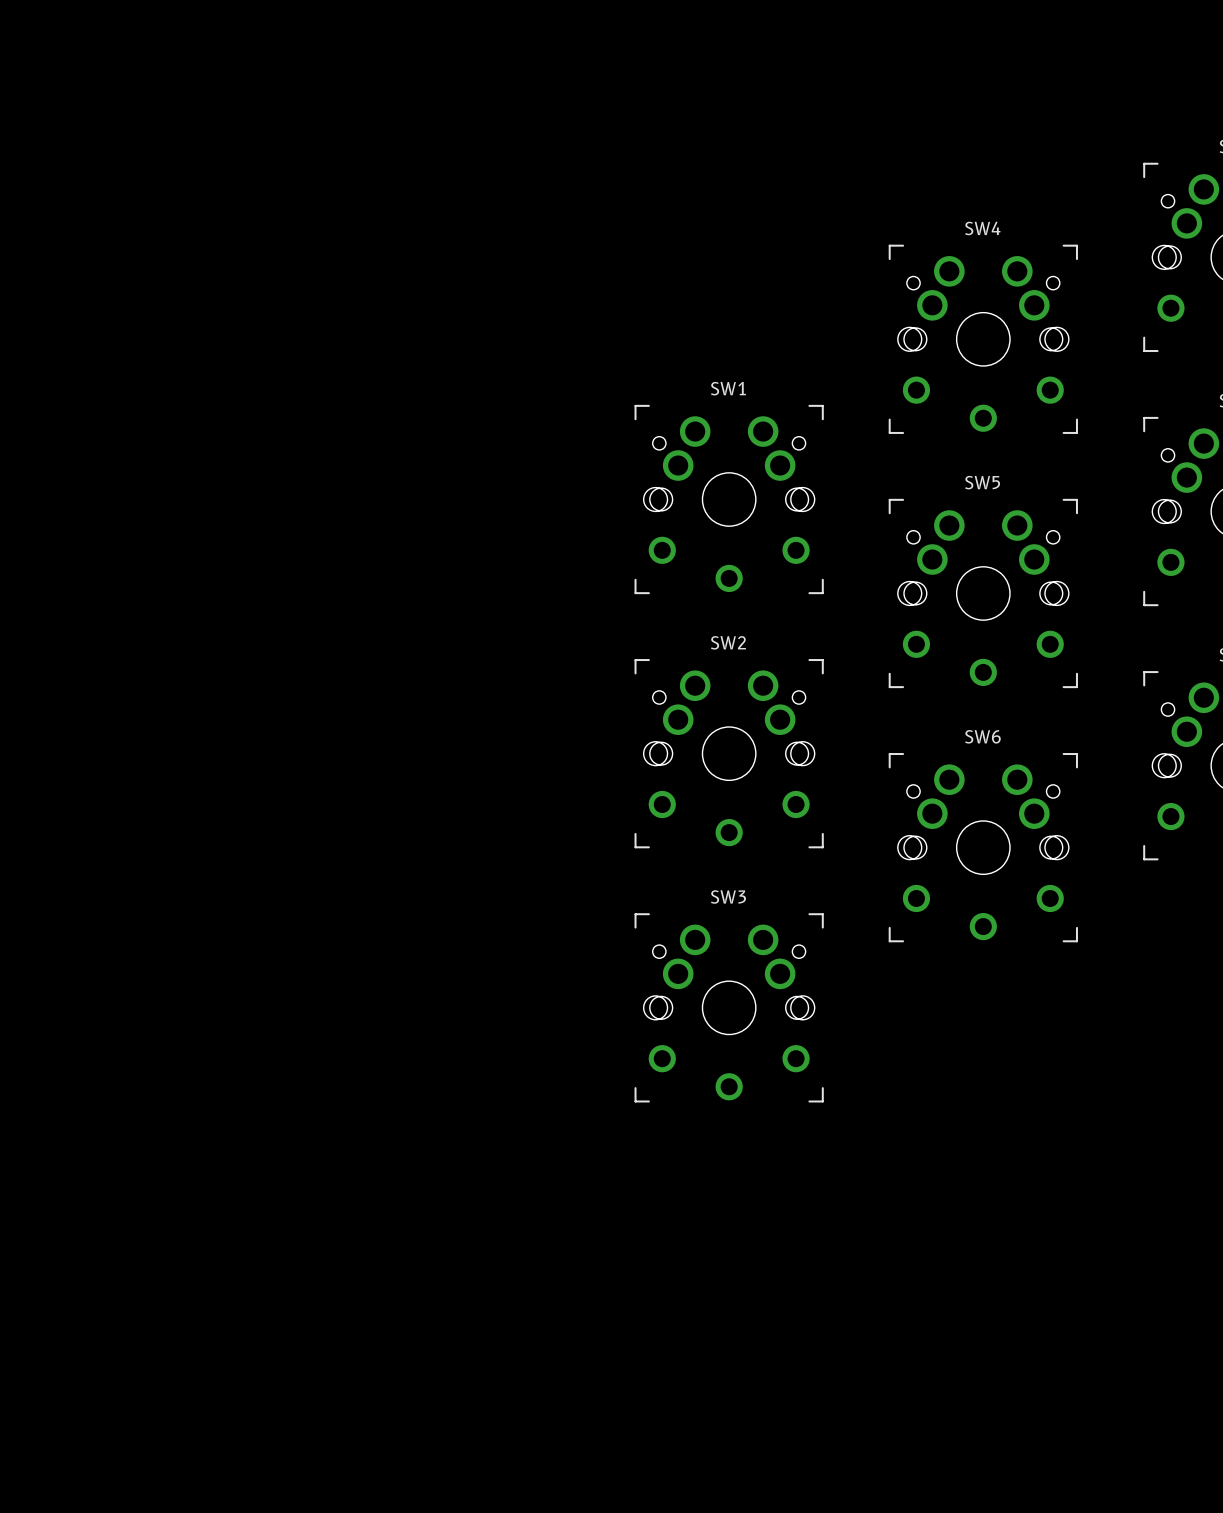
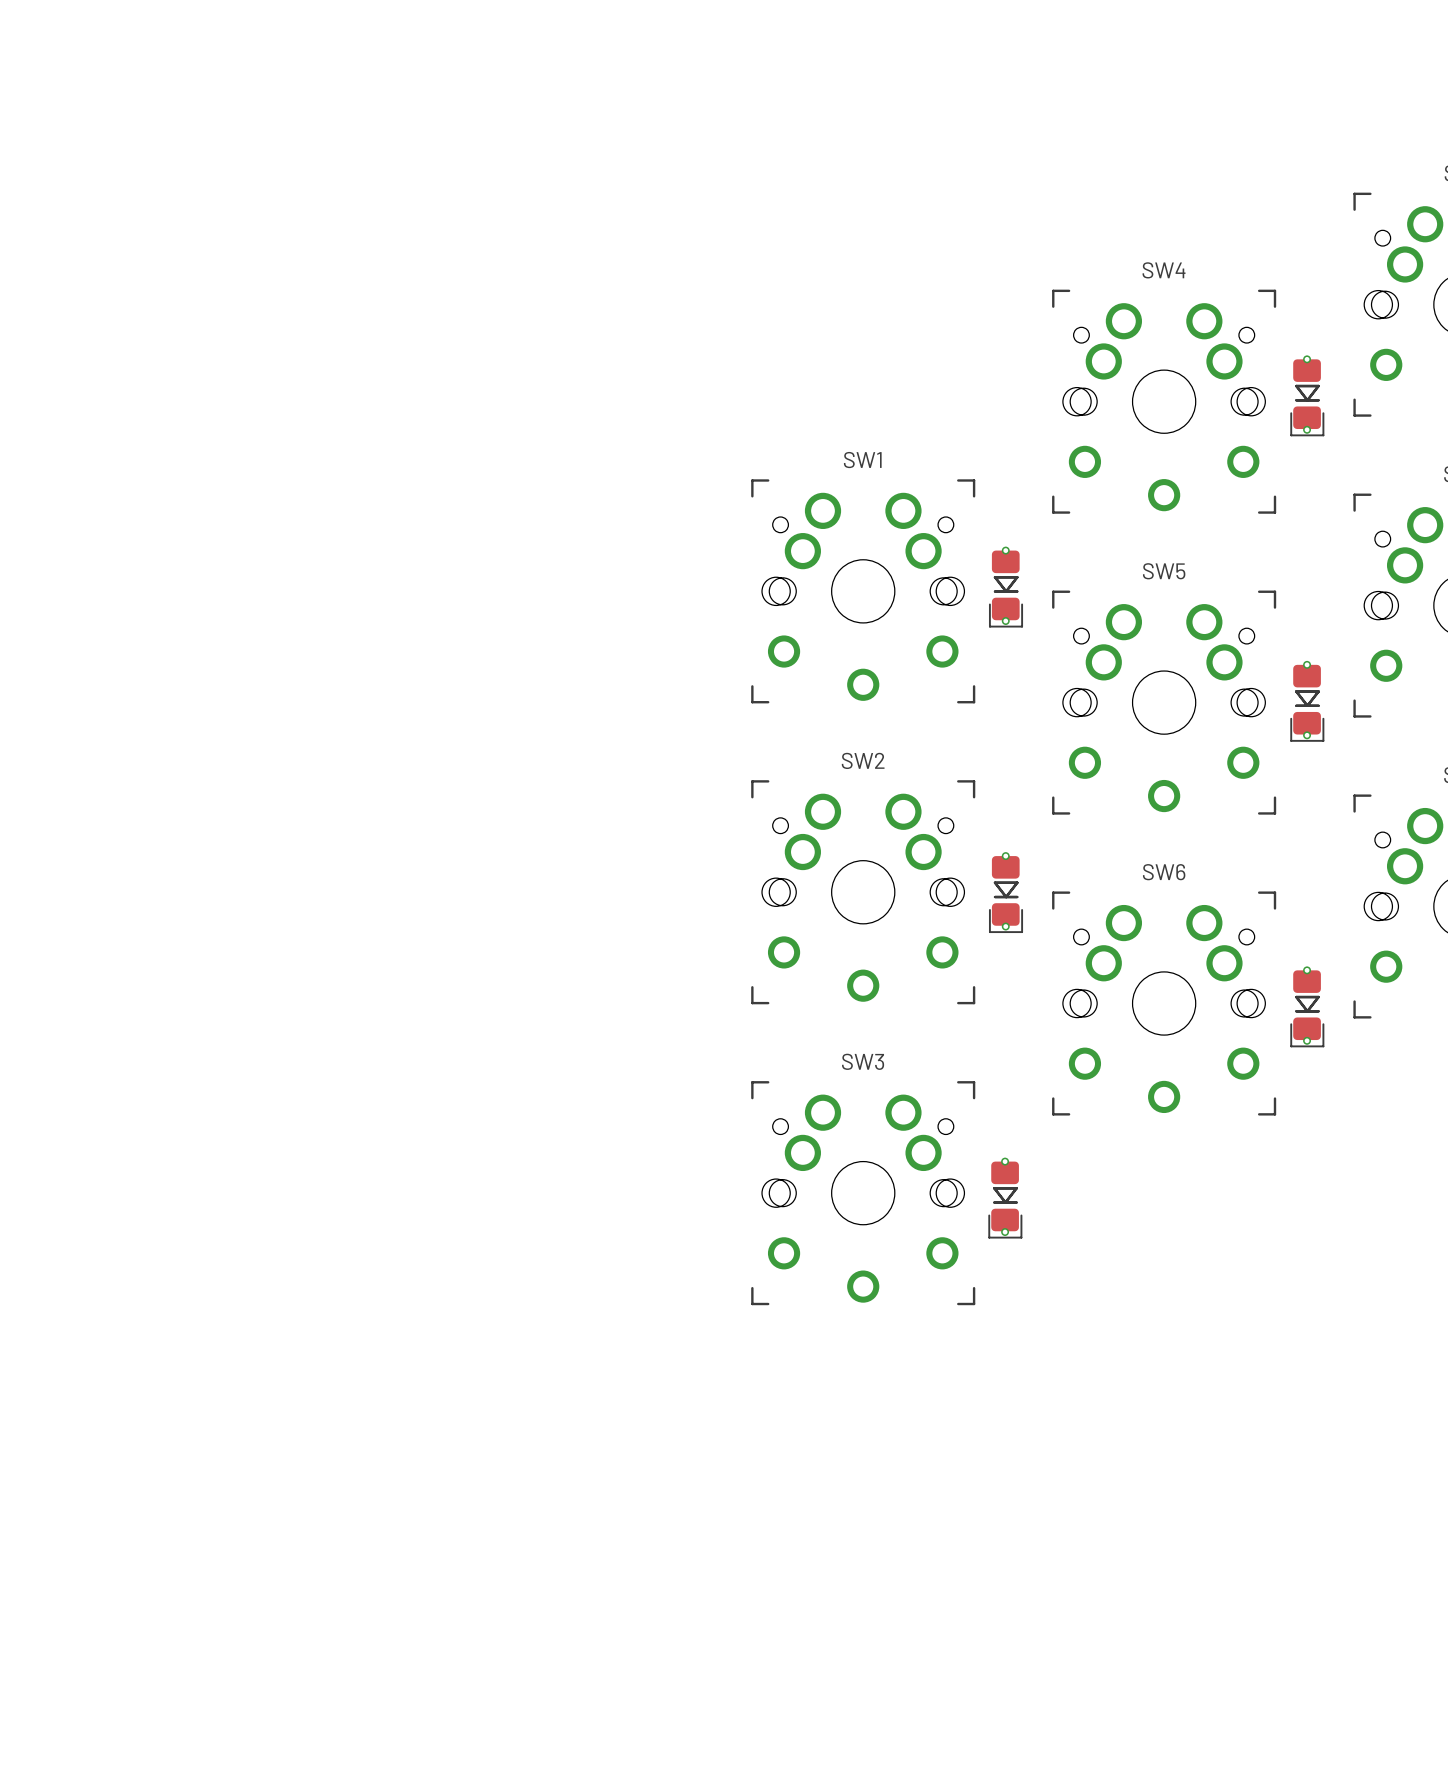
part: none -> (1307, 395)
part: none -> (1006, 587)
part: none -> (1307, 701)
part: none -> (1006, 892)
part: none -> (1307, 1006)
part: none -> (1005, 1198)

